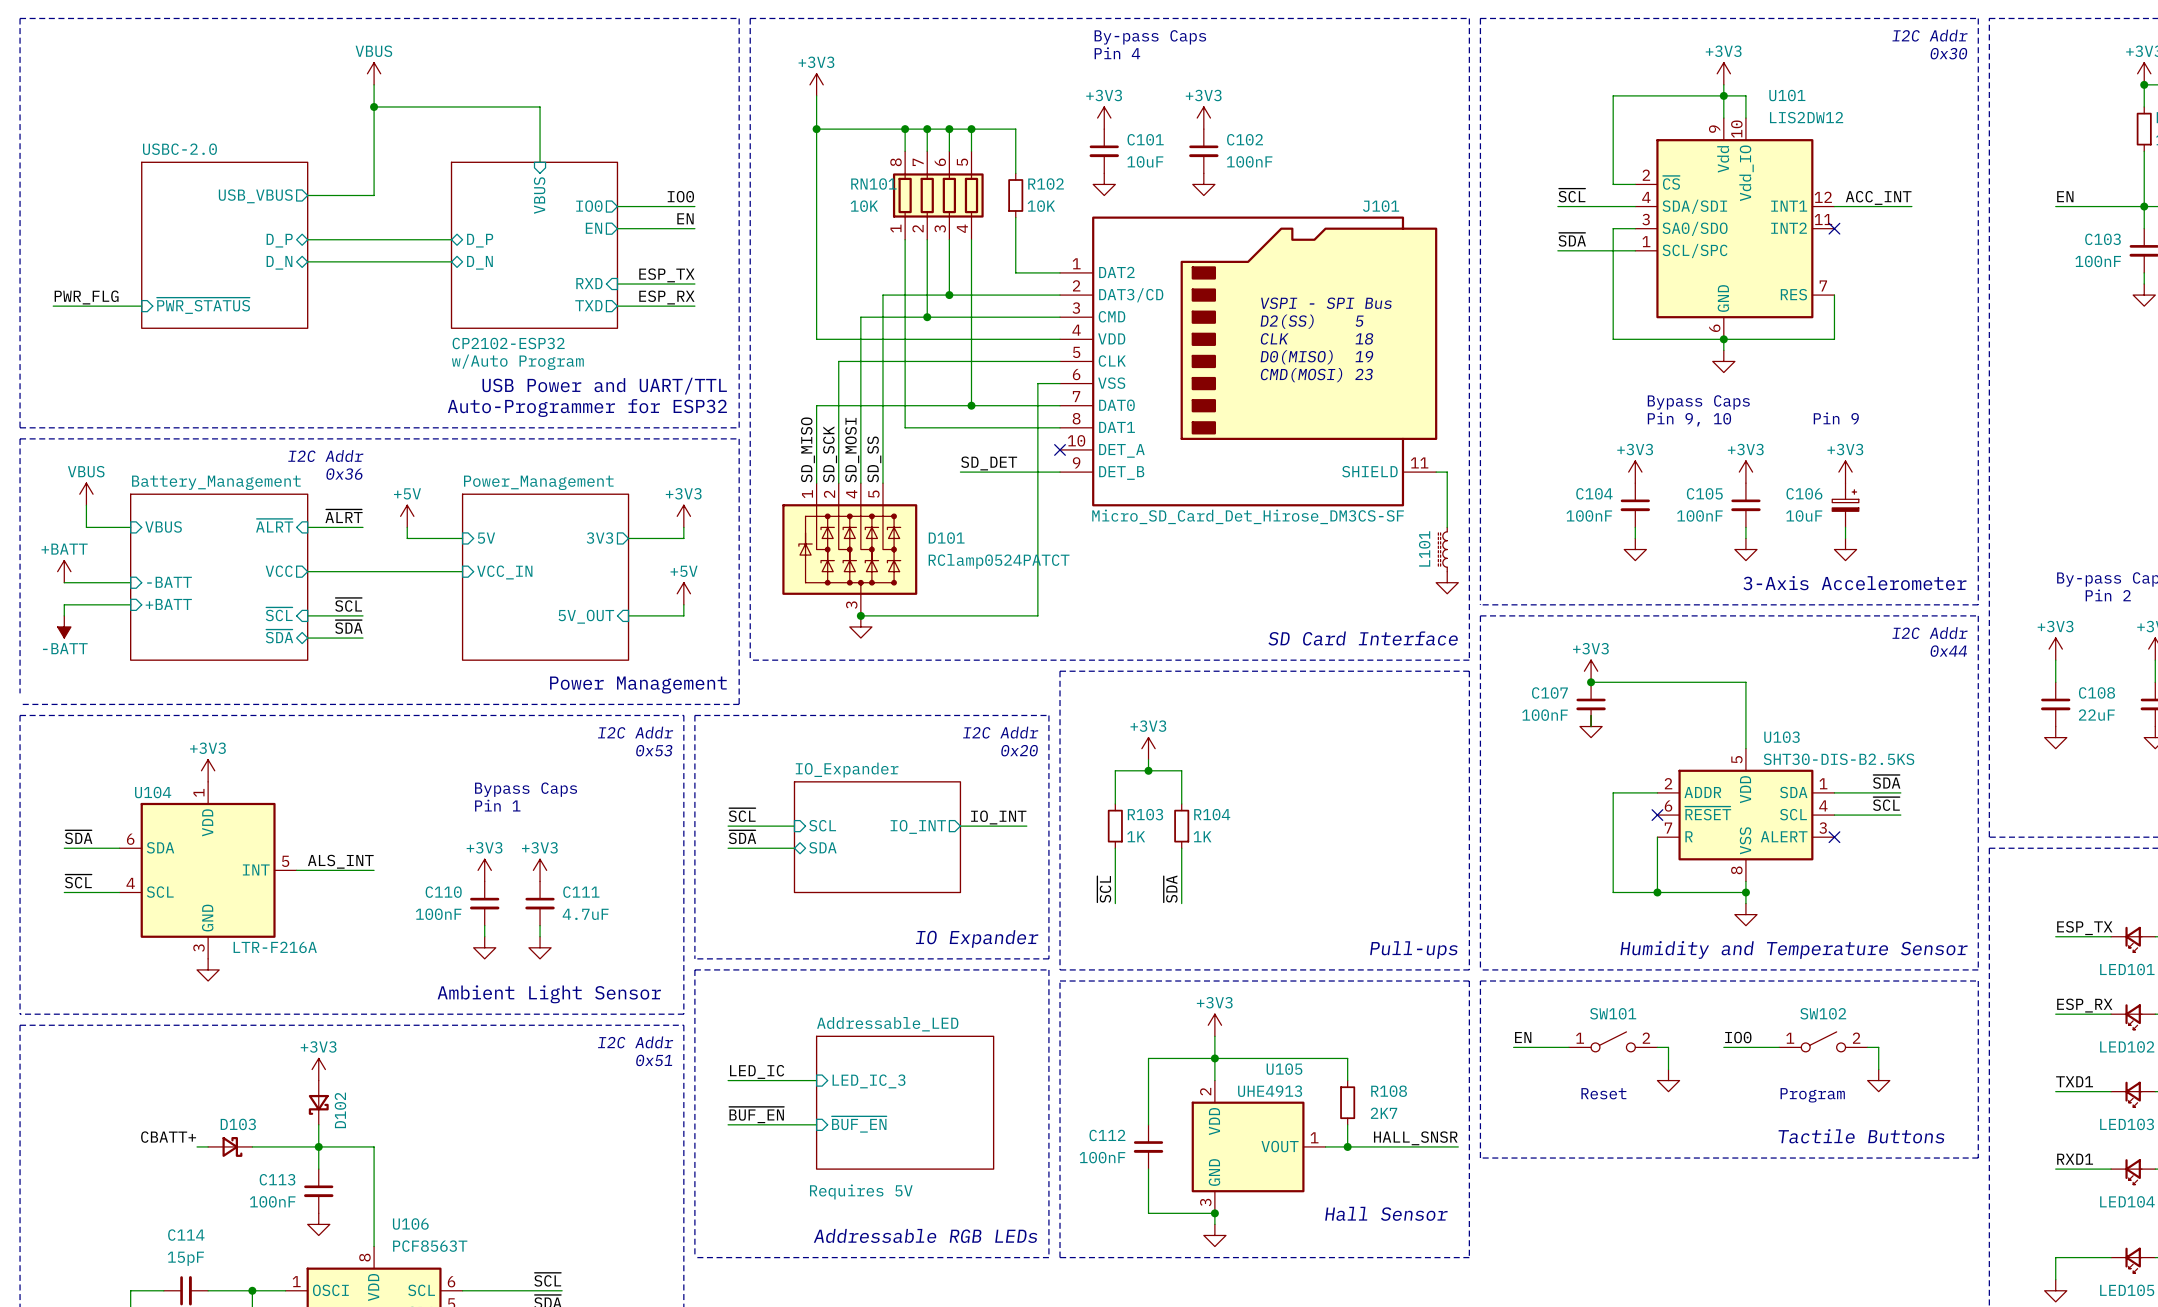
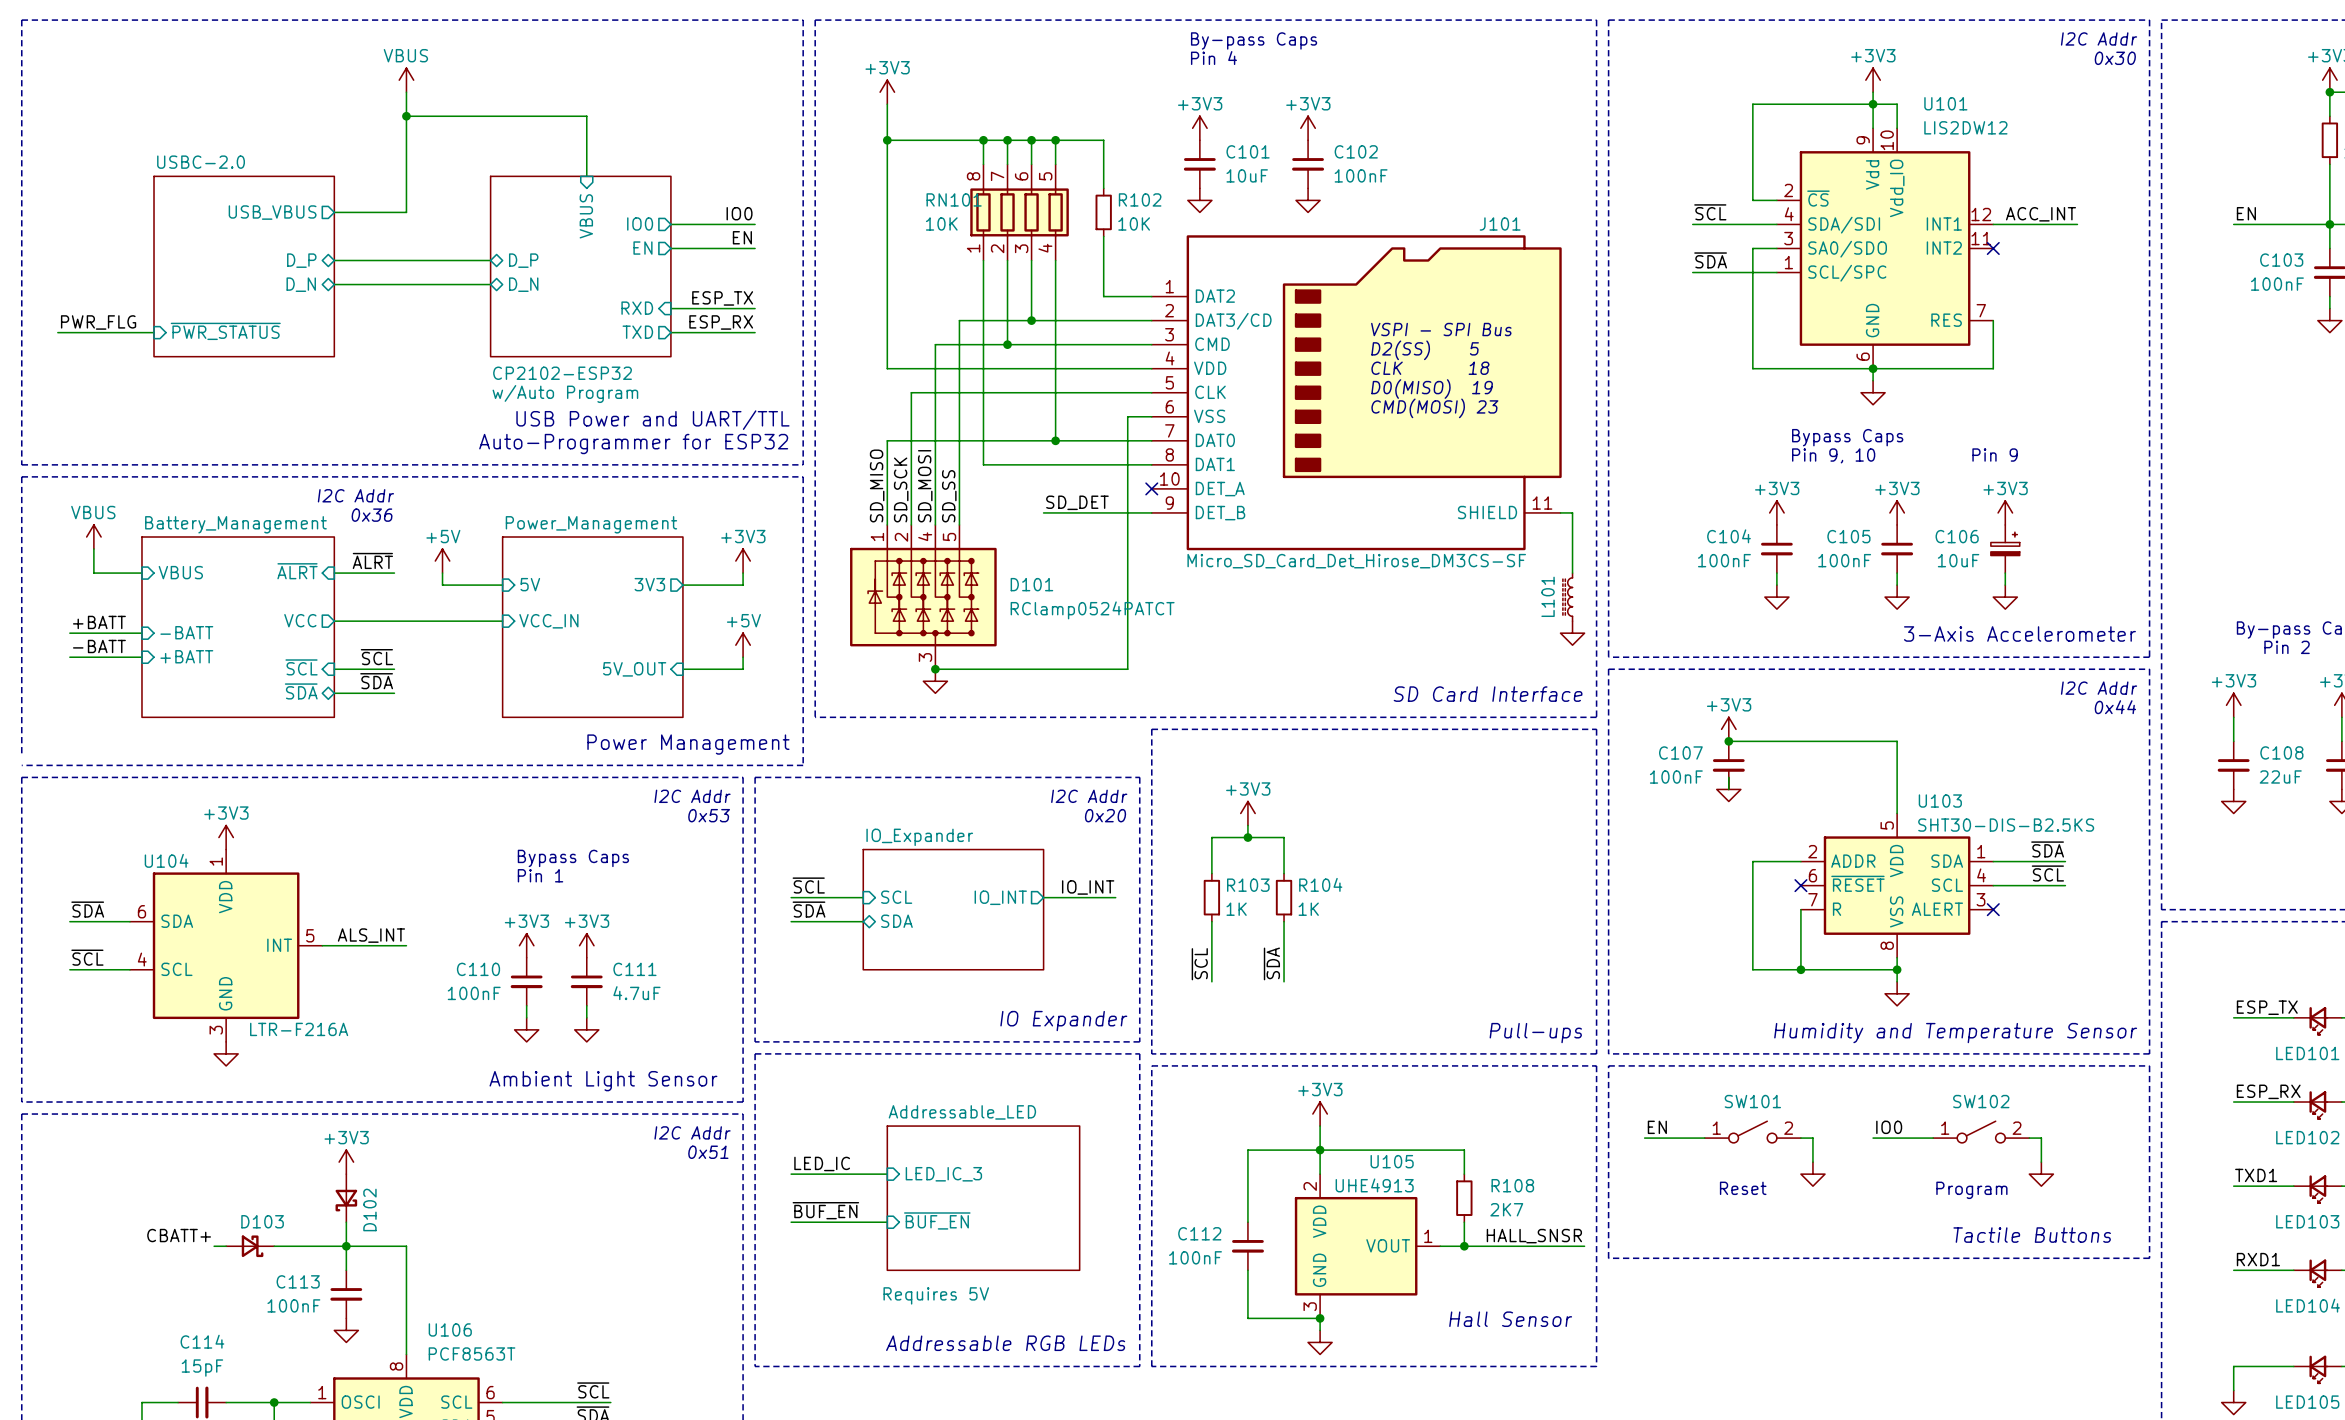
power symbol: +BATT (64, 571) -> none
label: none -> +BATT (99, 622)
label: none -> -BATT (99, 646)
wire: (64, 604) (64, 615) -> none
power symbol: -BATT (64, 626) -> none

